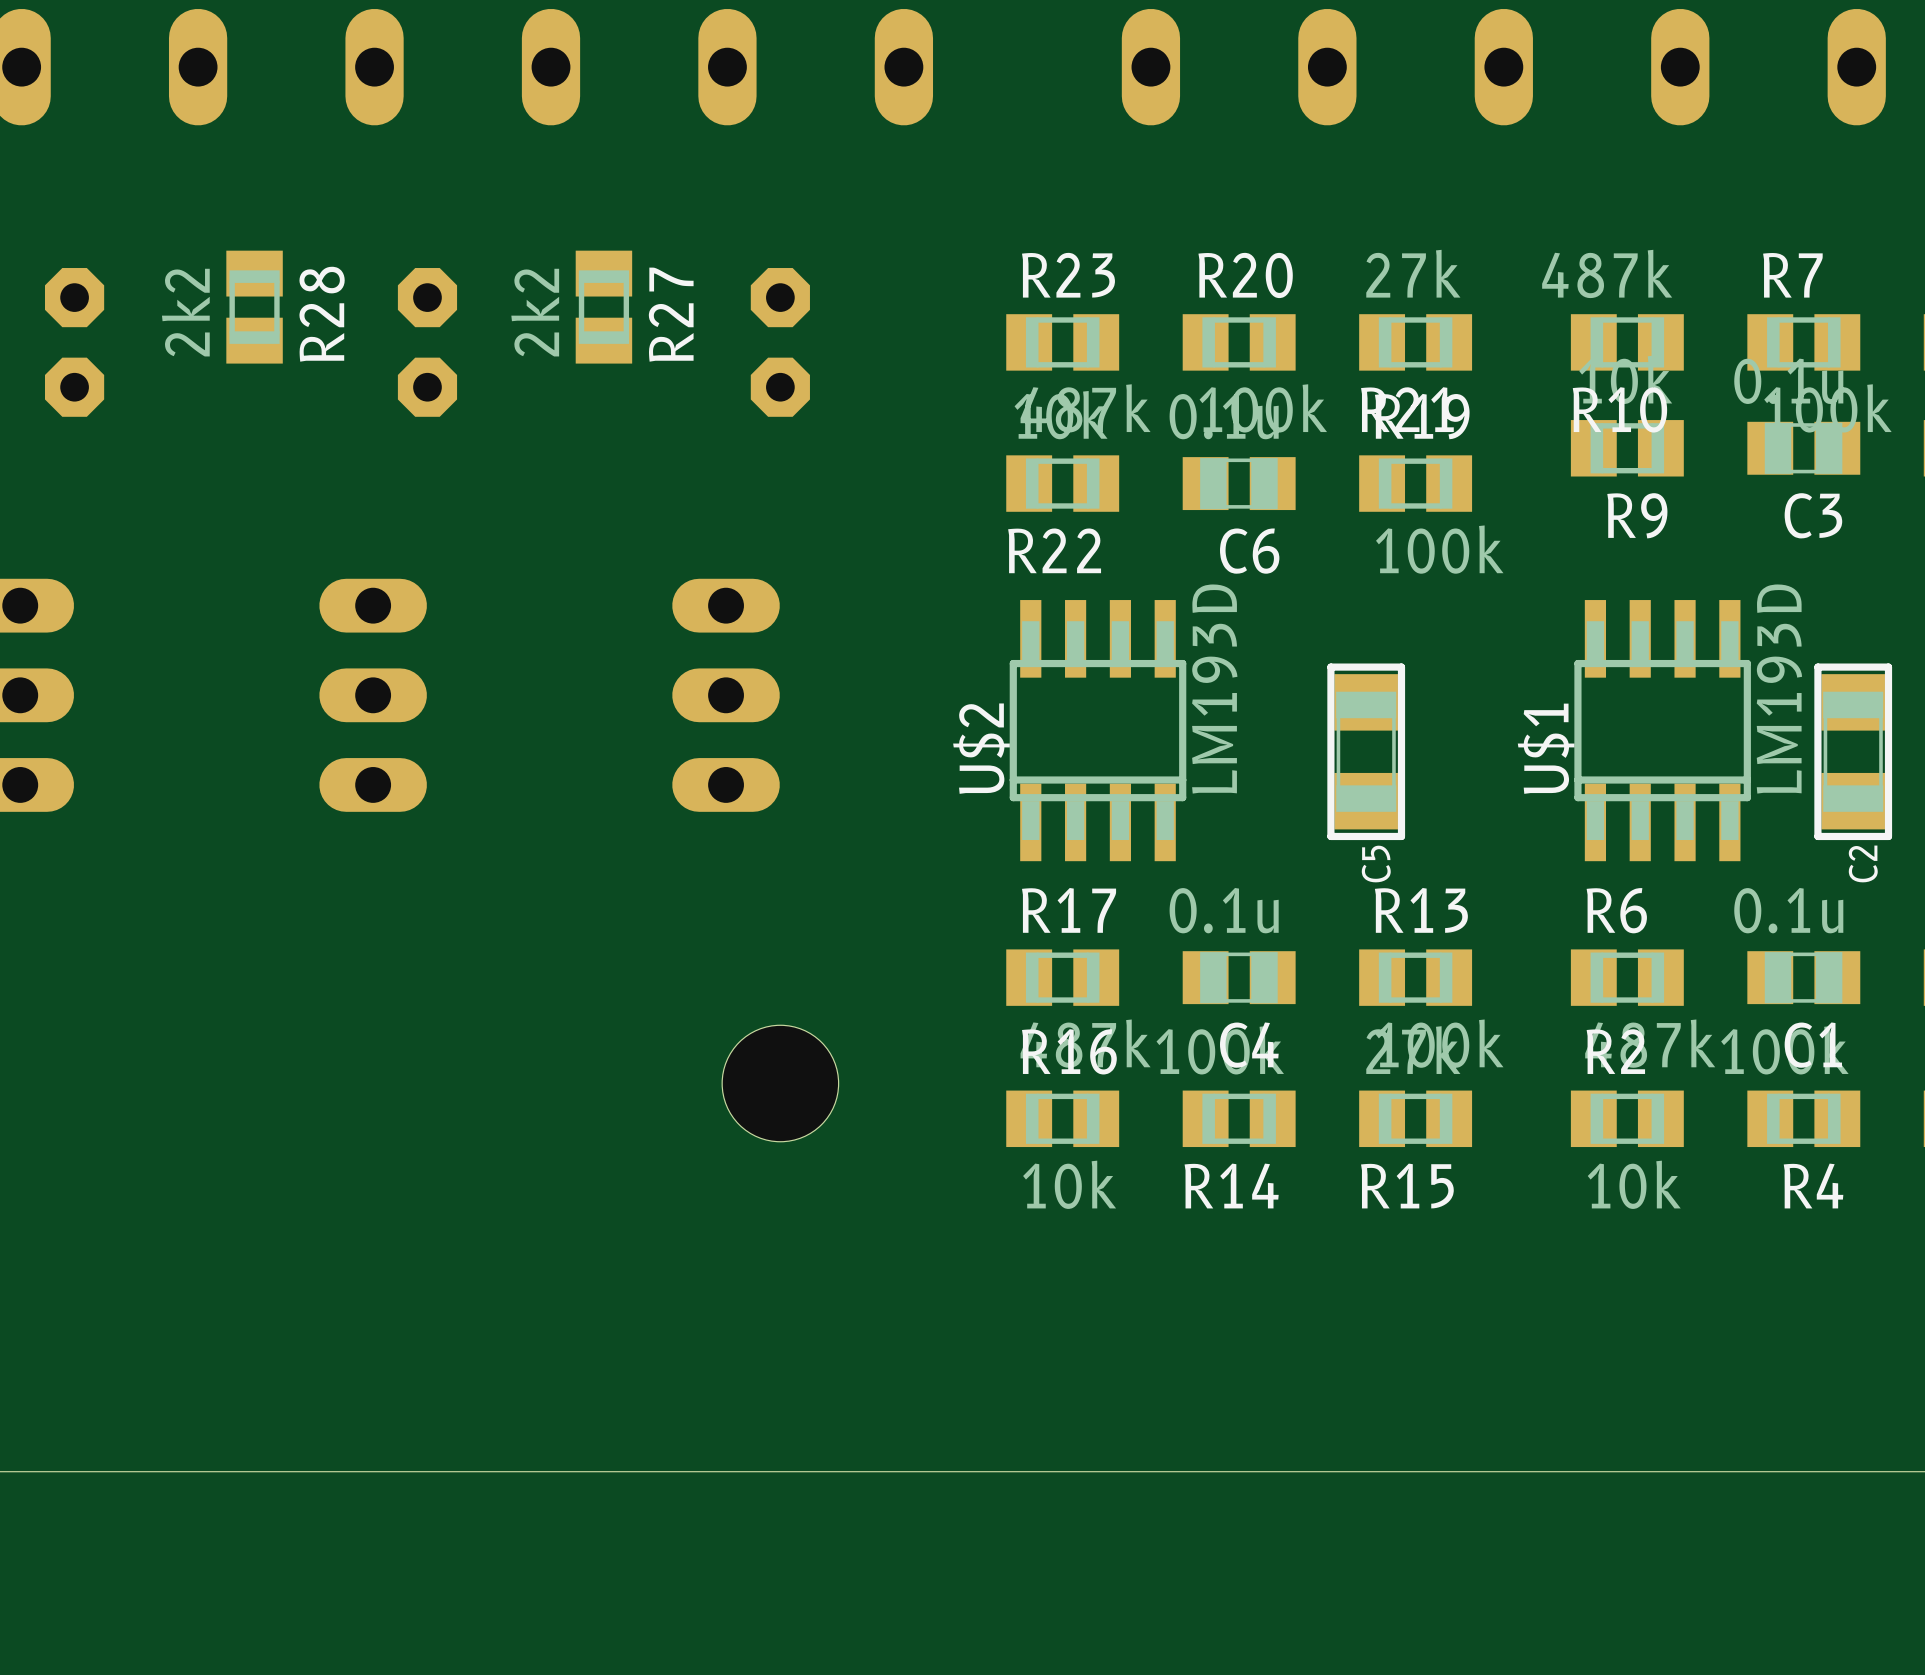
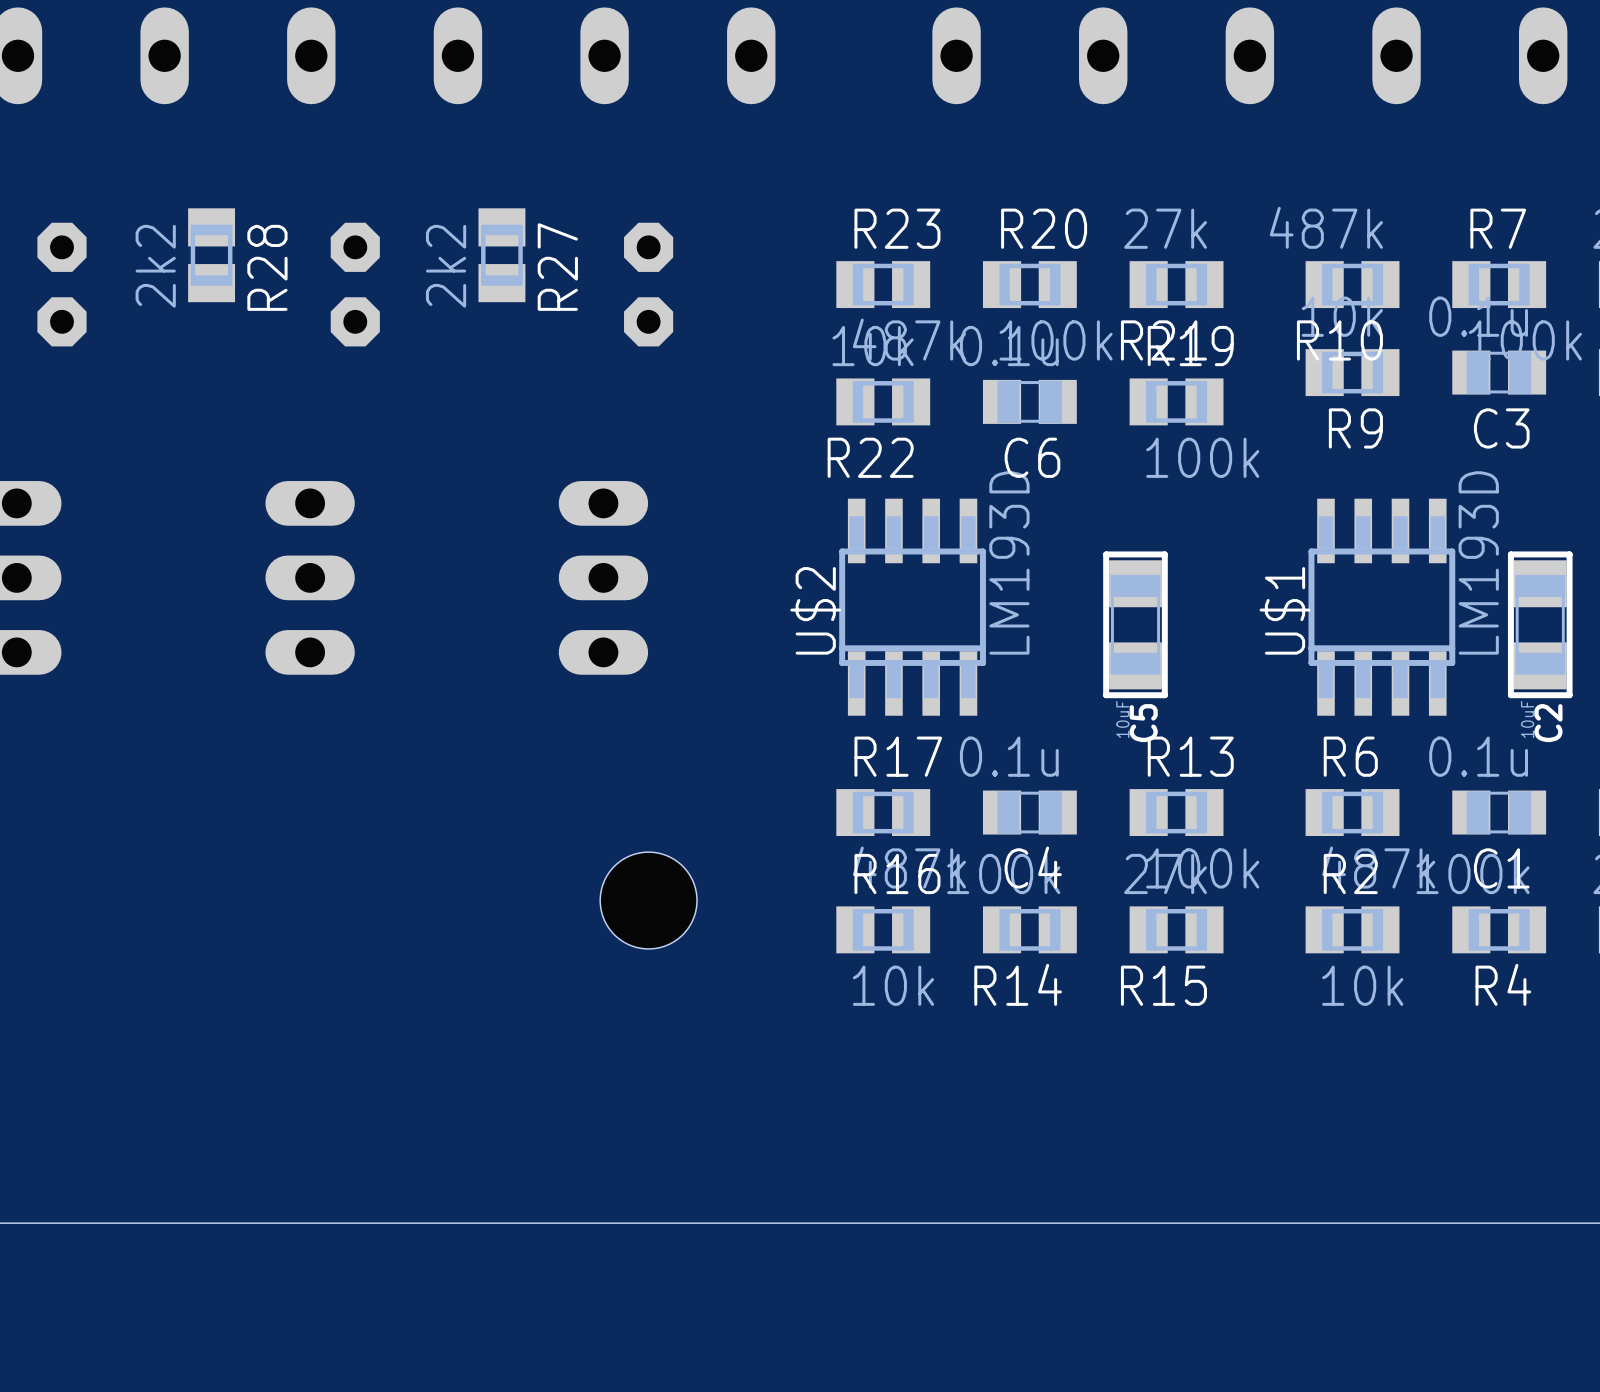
C5 value: none -> 10uF (1122, 719)
C2 value: none -> 10uF (1527, 719)

